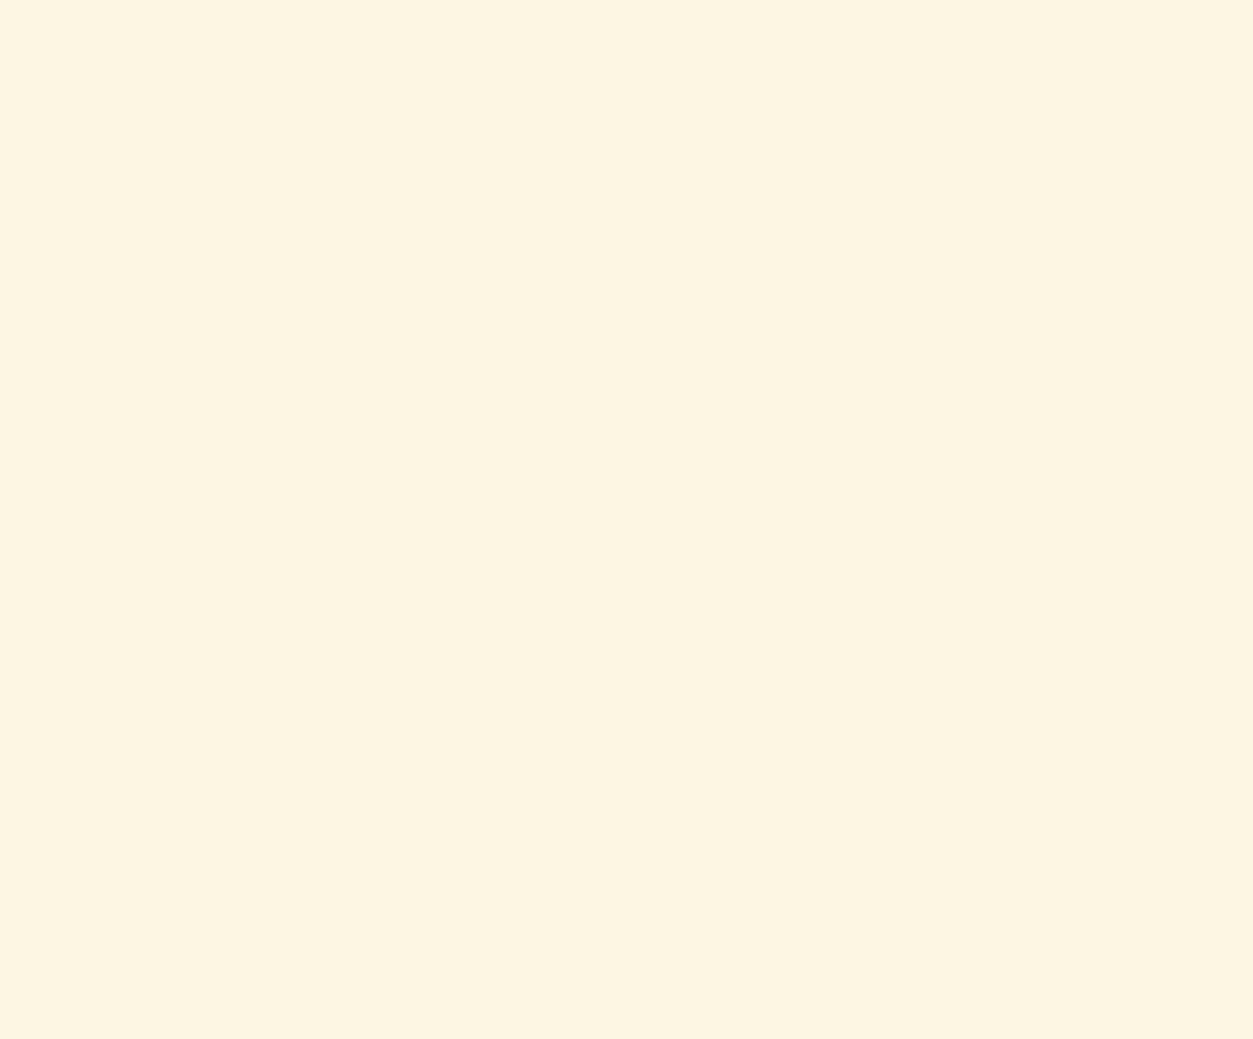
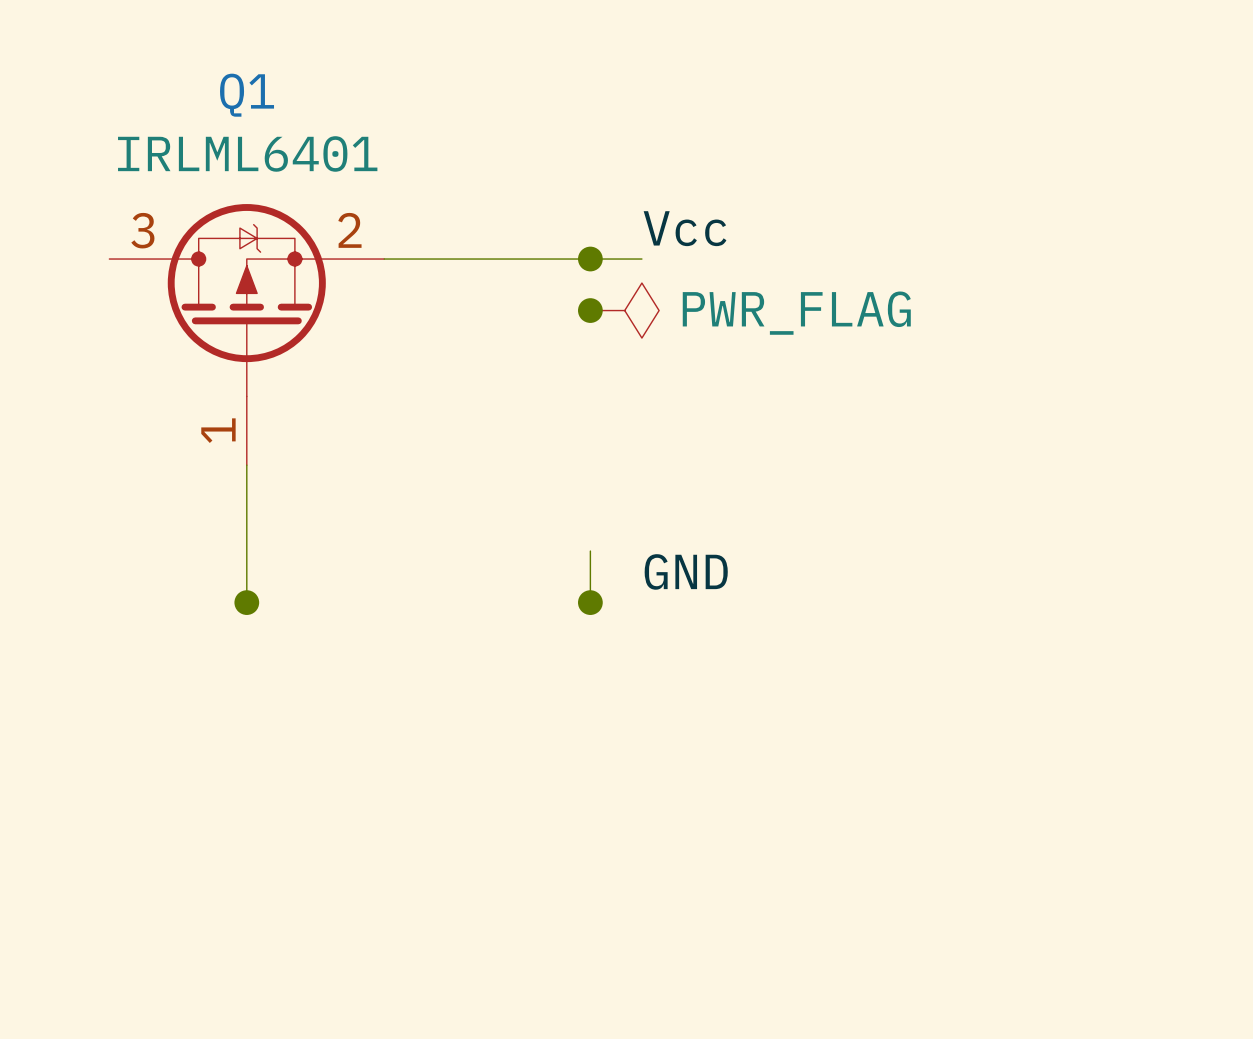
label: none -> Vcc (685, 228)
wire: none -> (384, 259) (641, 259)
junction: none -> (590, 259)
junction: none -> (590, 310)
power symbol: none -> PWR_FLAG (624, 310)
Q1: none -> IRLML6401 (246, 334)
wire: none -> (246, 465) (246, 602)
wire: none -> (590, 551) (590, 602)
label: none -> GND (686, 571)
junction: none -> (246, 602)
junction: none -> (590, 602)

